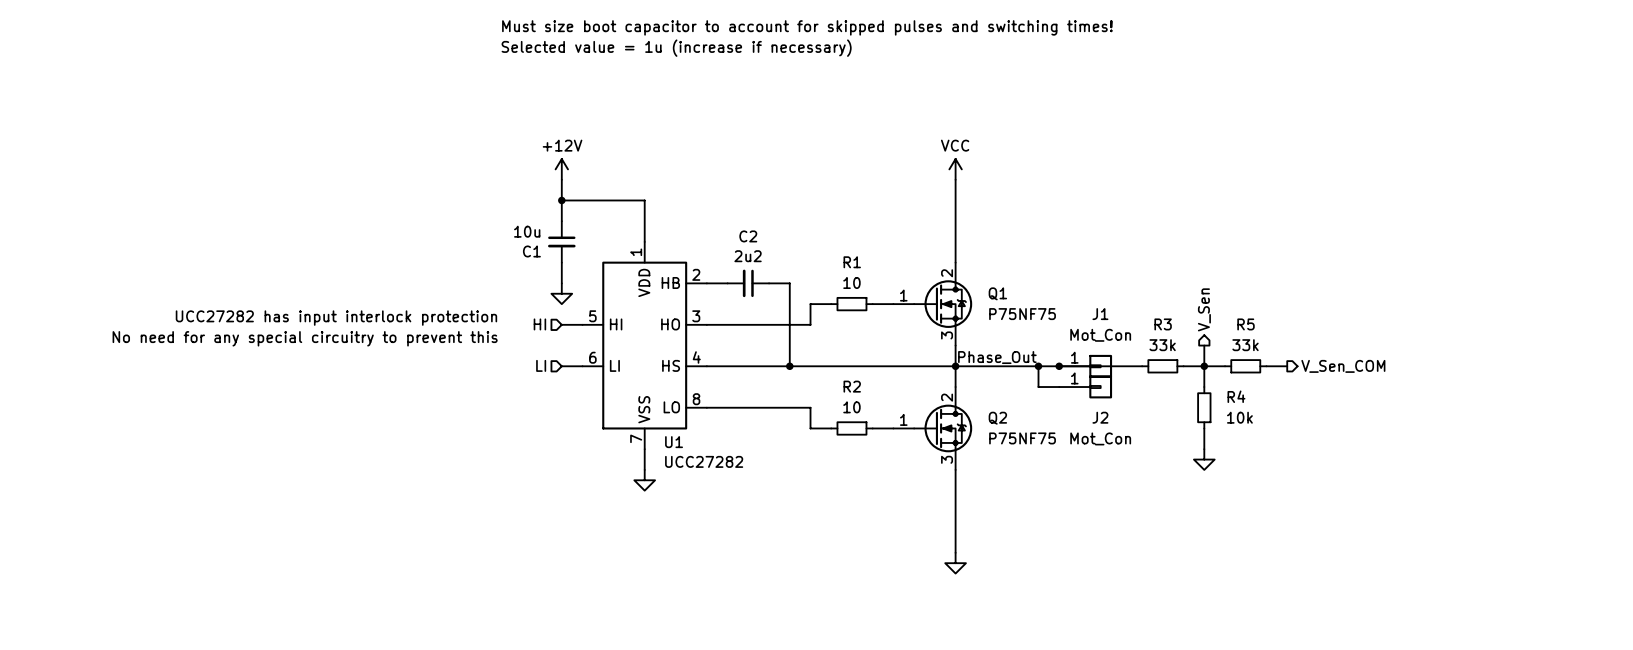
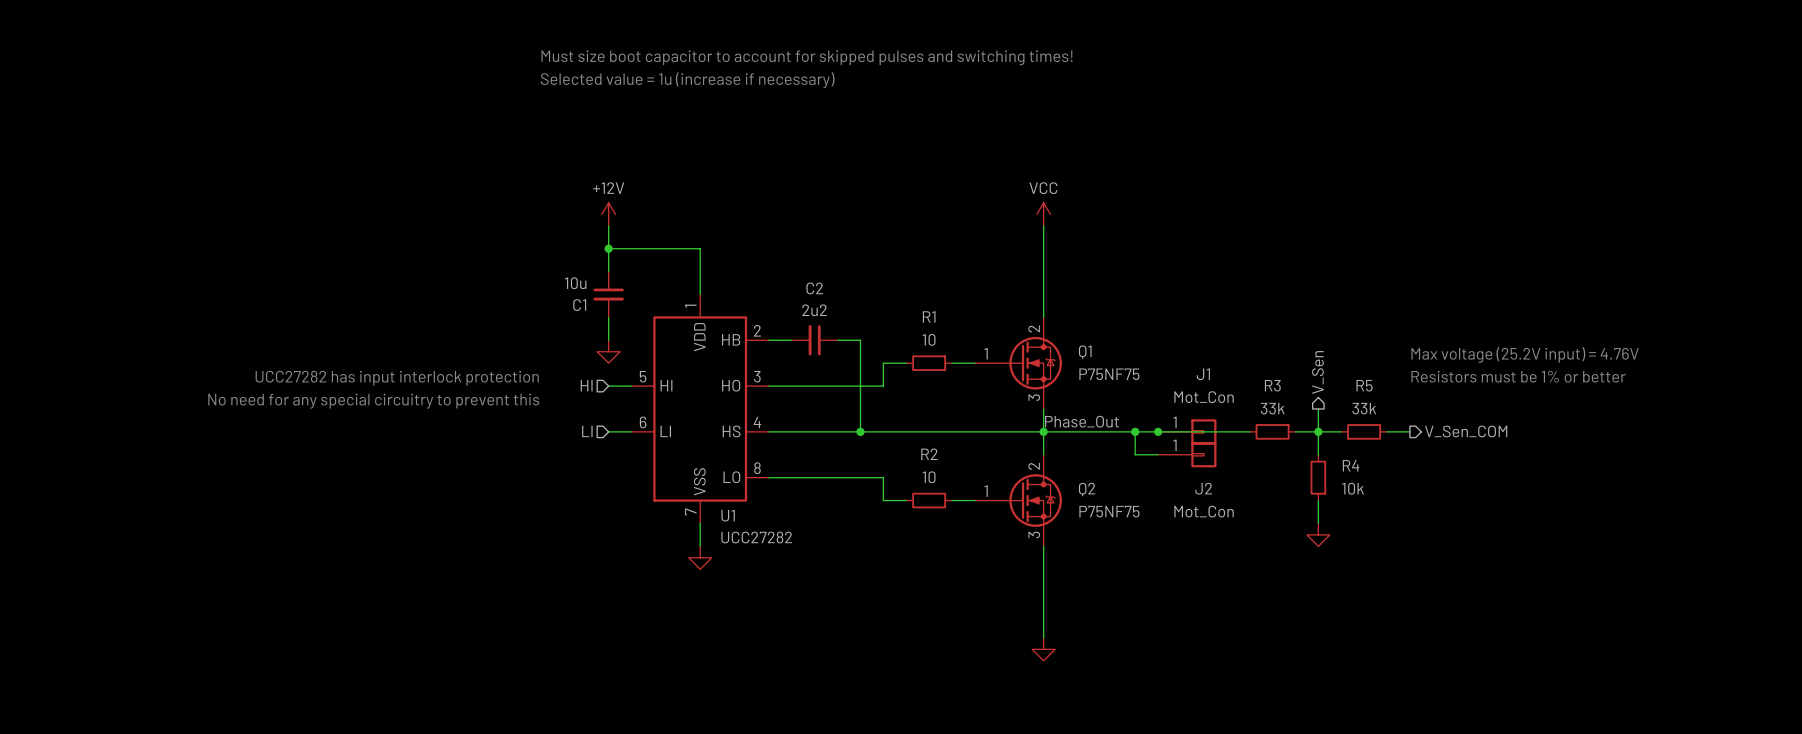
text: none -> Max voltage (25.2V input) = 4.76V (1525, 354)
text: none -> Resistors must be 1% or better (1518, 376)

